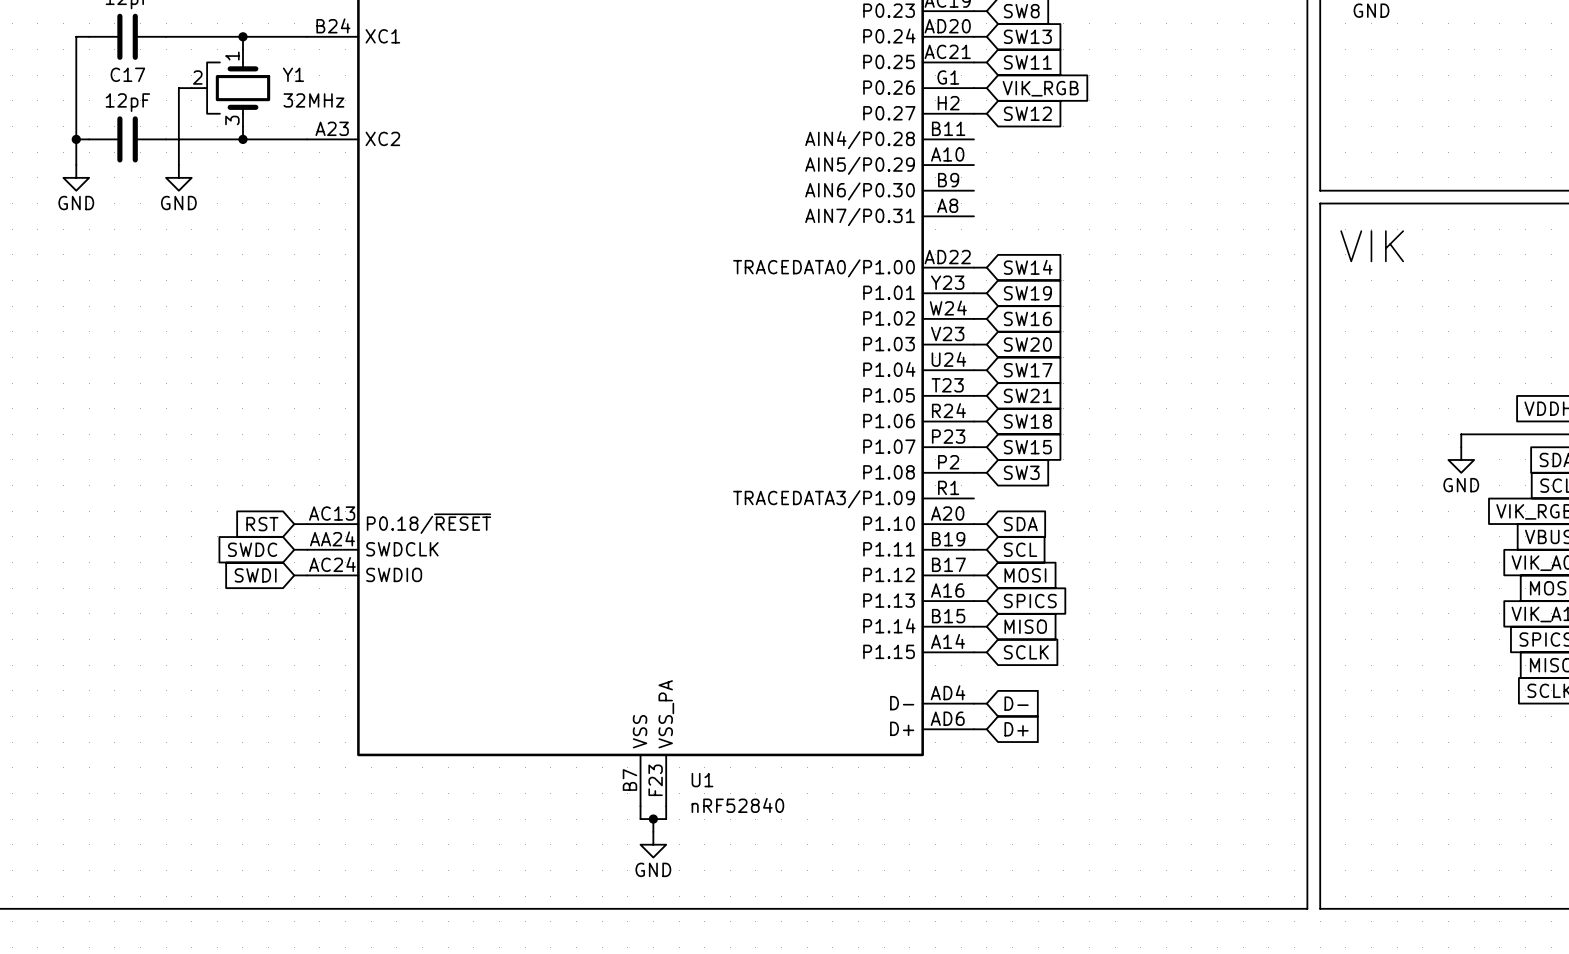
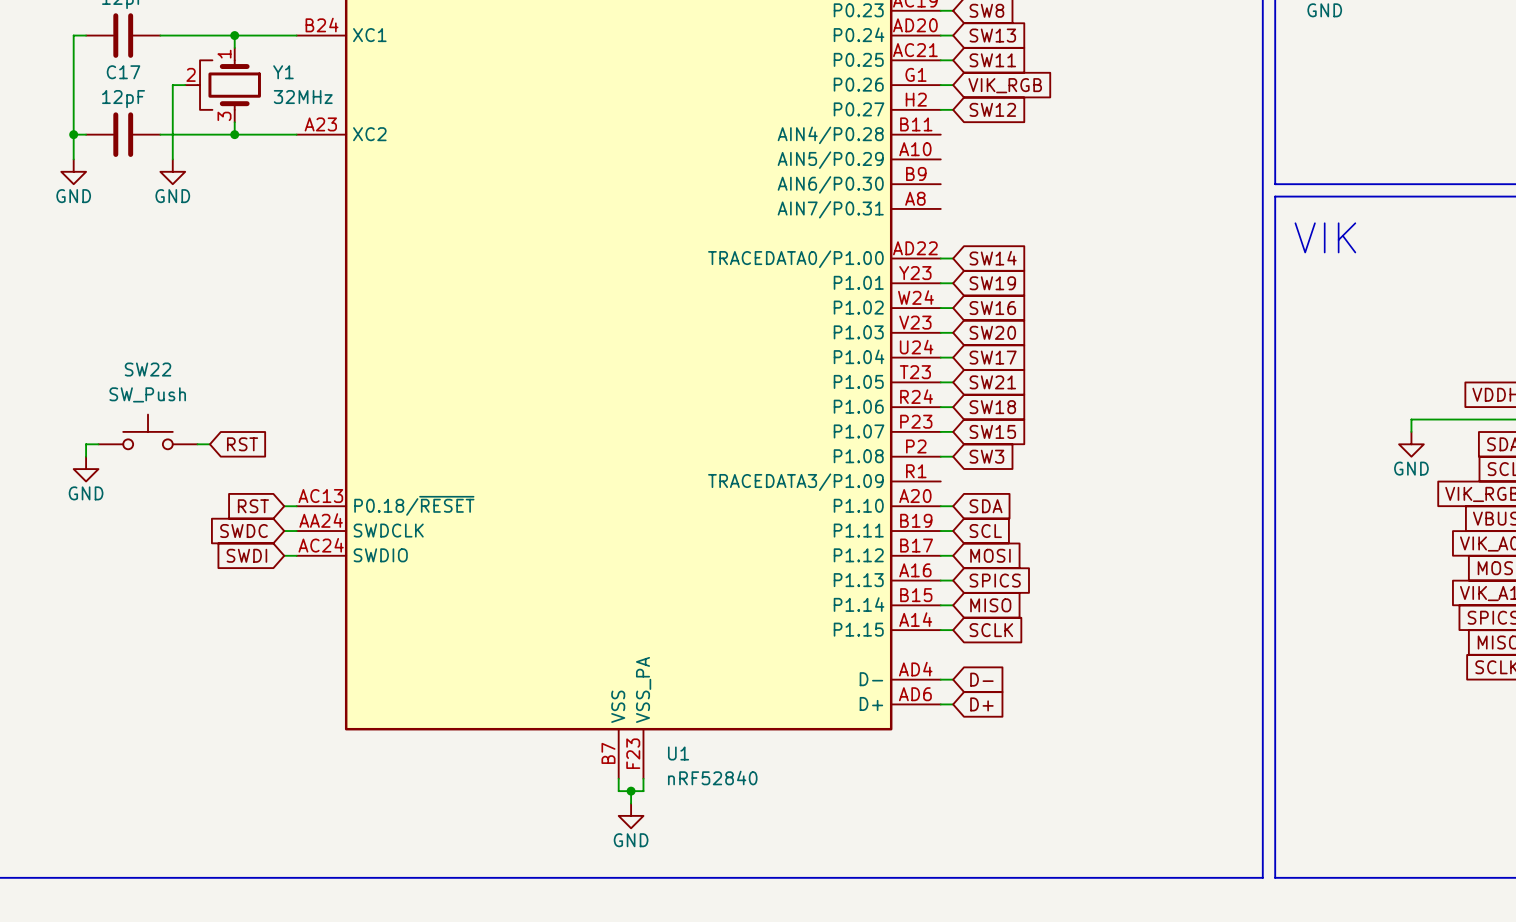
SW22: none -> SW_Push (148, 431)
wire: none -> (98, 444) (86, 444) (86, 456)
wire: none -> (197, 444) (209, 444)
global label: none -> RST (242, 444)
power symbol: none -> GND (86, 469)

